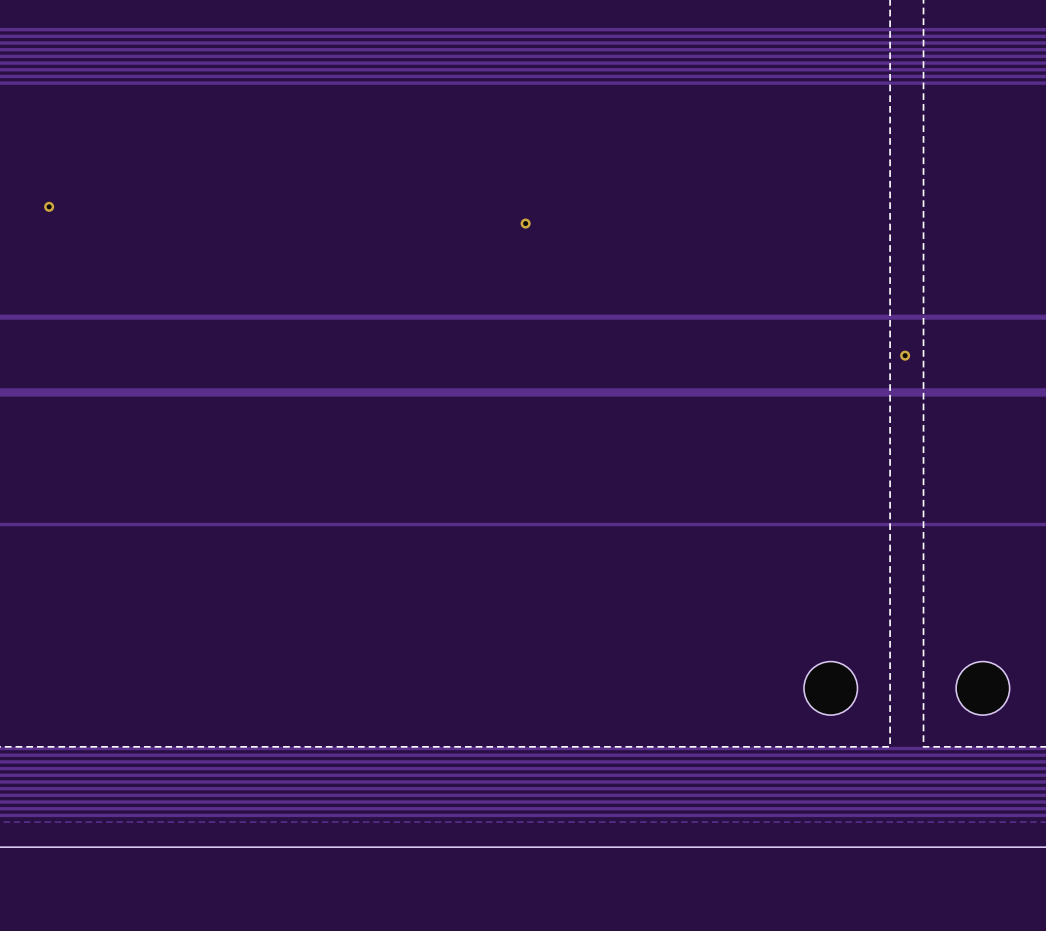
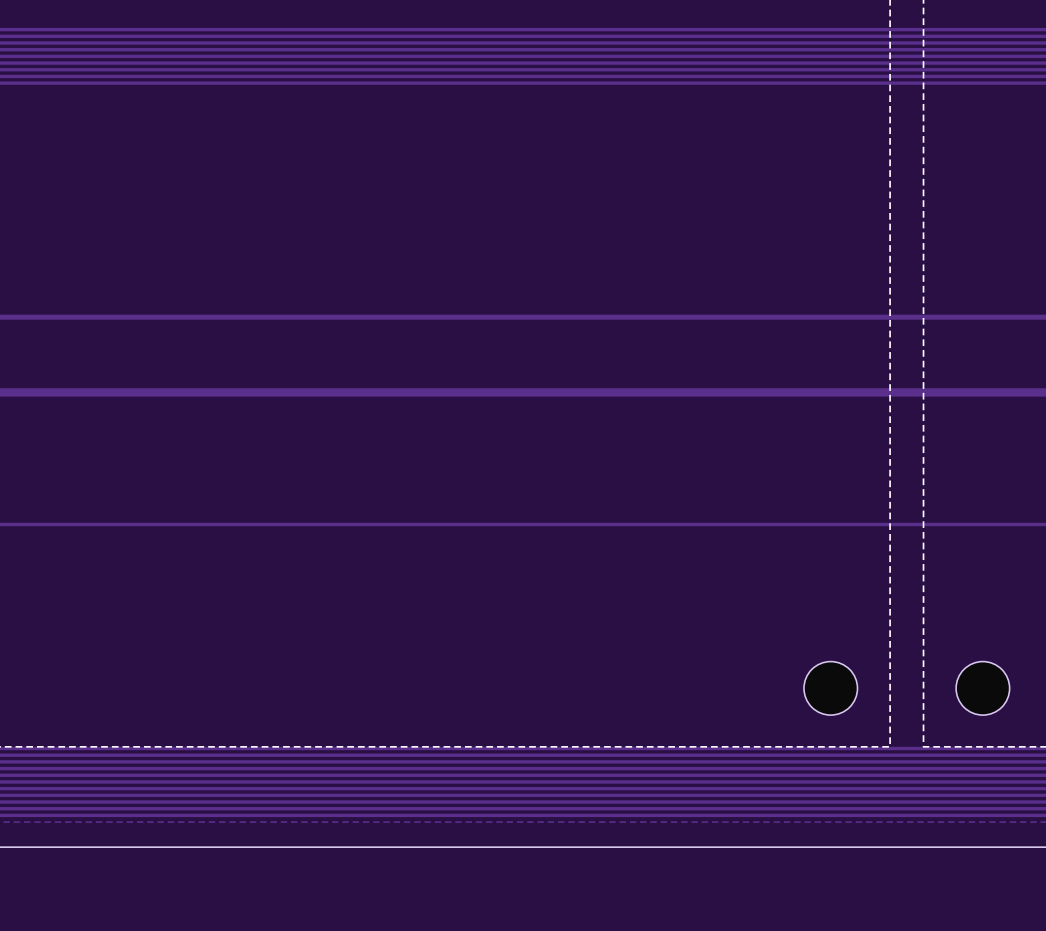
via: (49, 206) -> none
via: (525, 223) -> none
via: (905, 355) -> none

